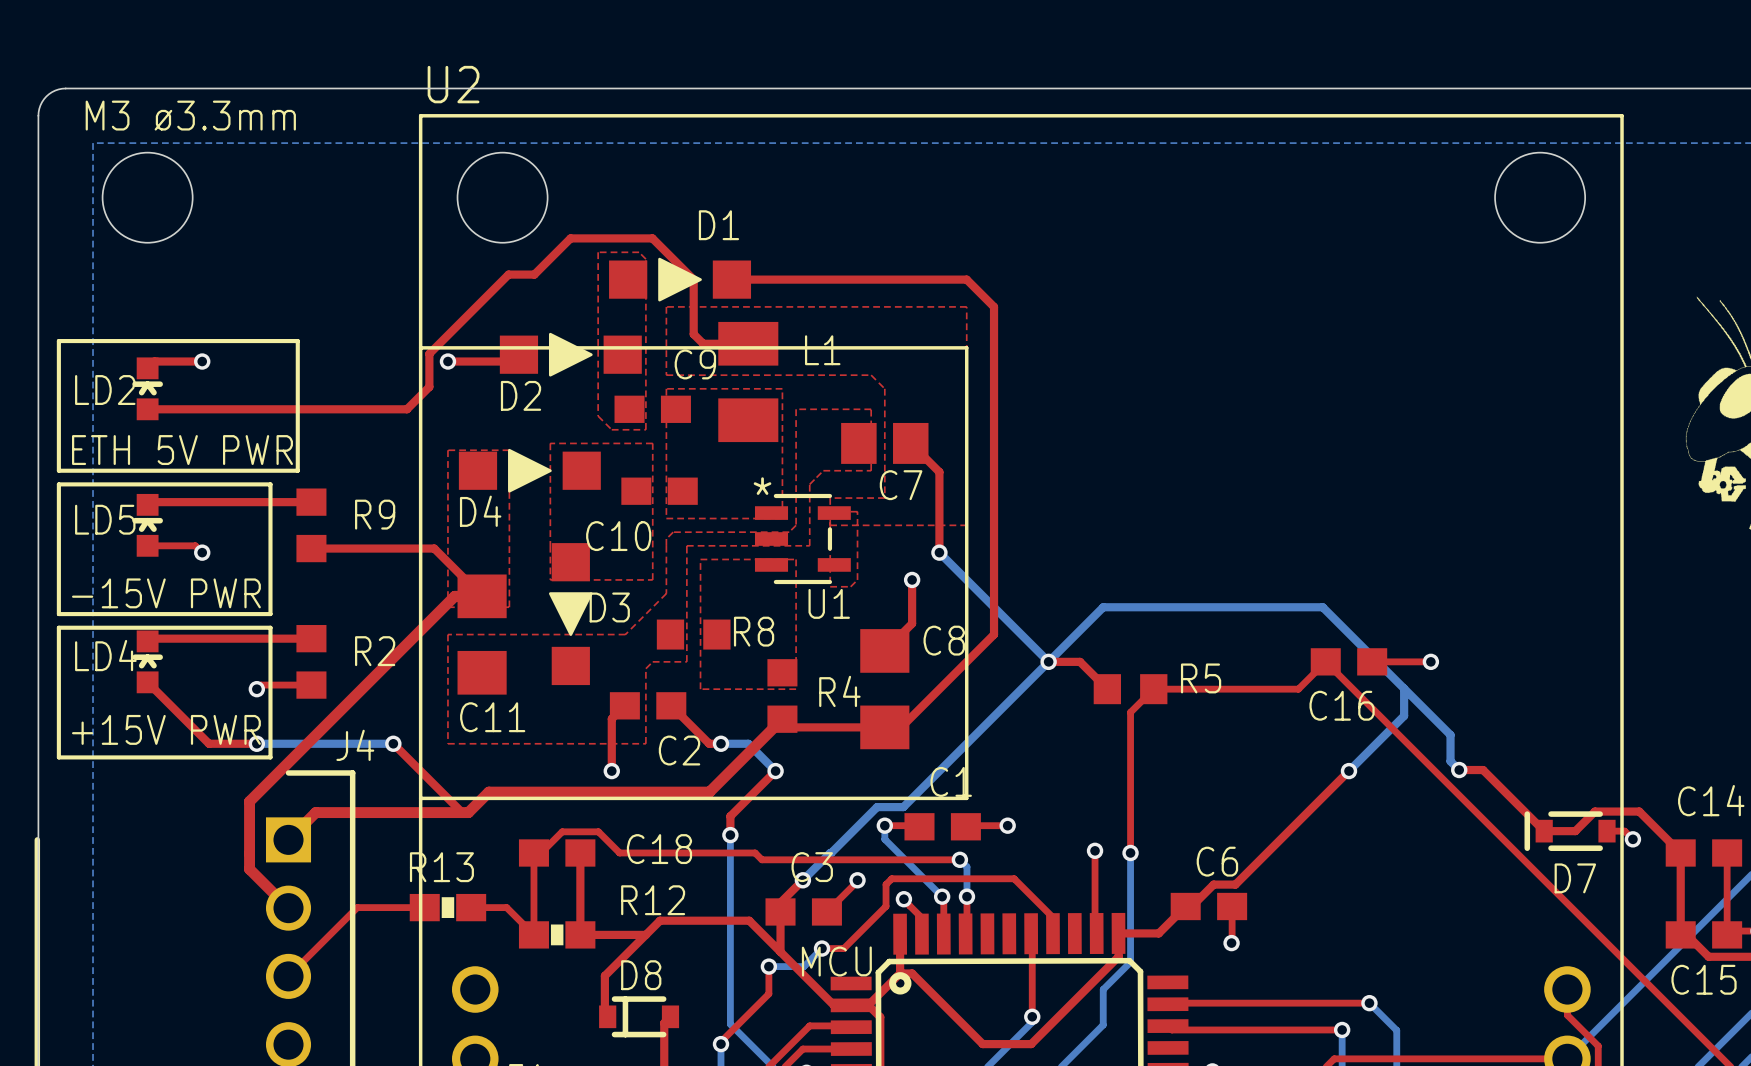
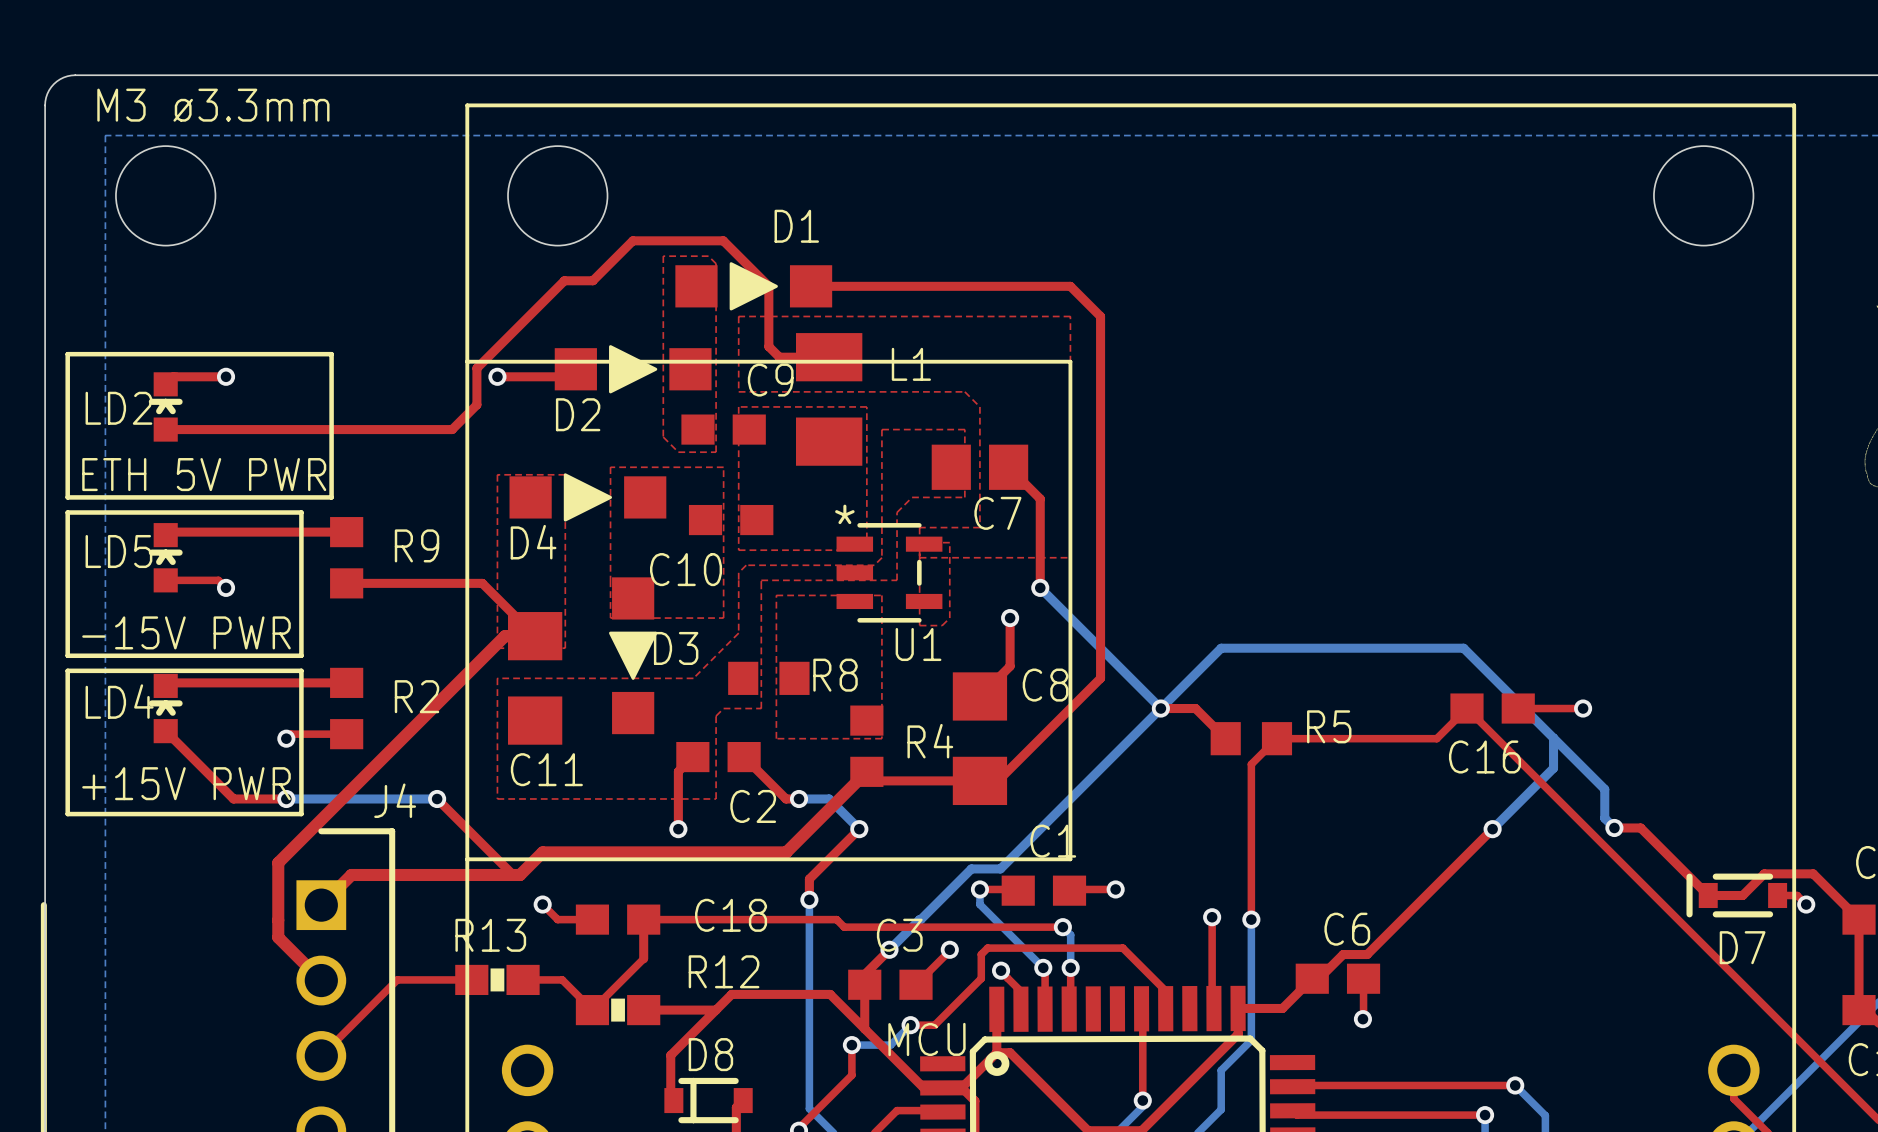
U2 name: U2 (453, 84) -> none
top track: none -> (542, 904) (557, 919) (592, 919)
via: none -> (542, 904)
top track: (619, 852) (598, 831) (562, 831) (541, 852) (533, 852) (533, 934) -> (687, 919) (643, 919)
top track: (580, 888) (580, 934) -> (643, 958) (592, 1010)

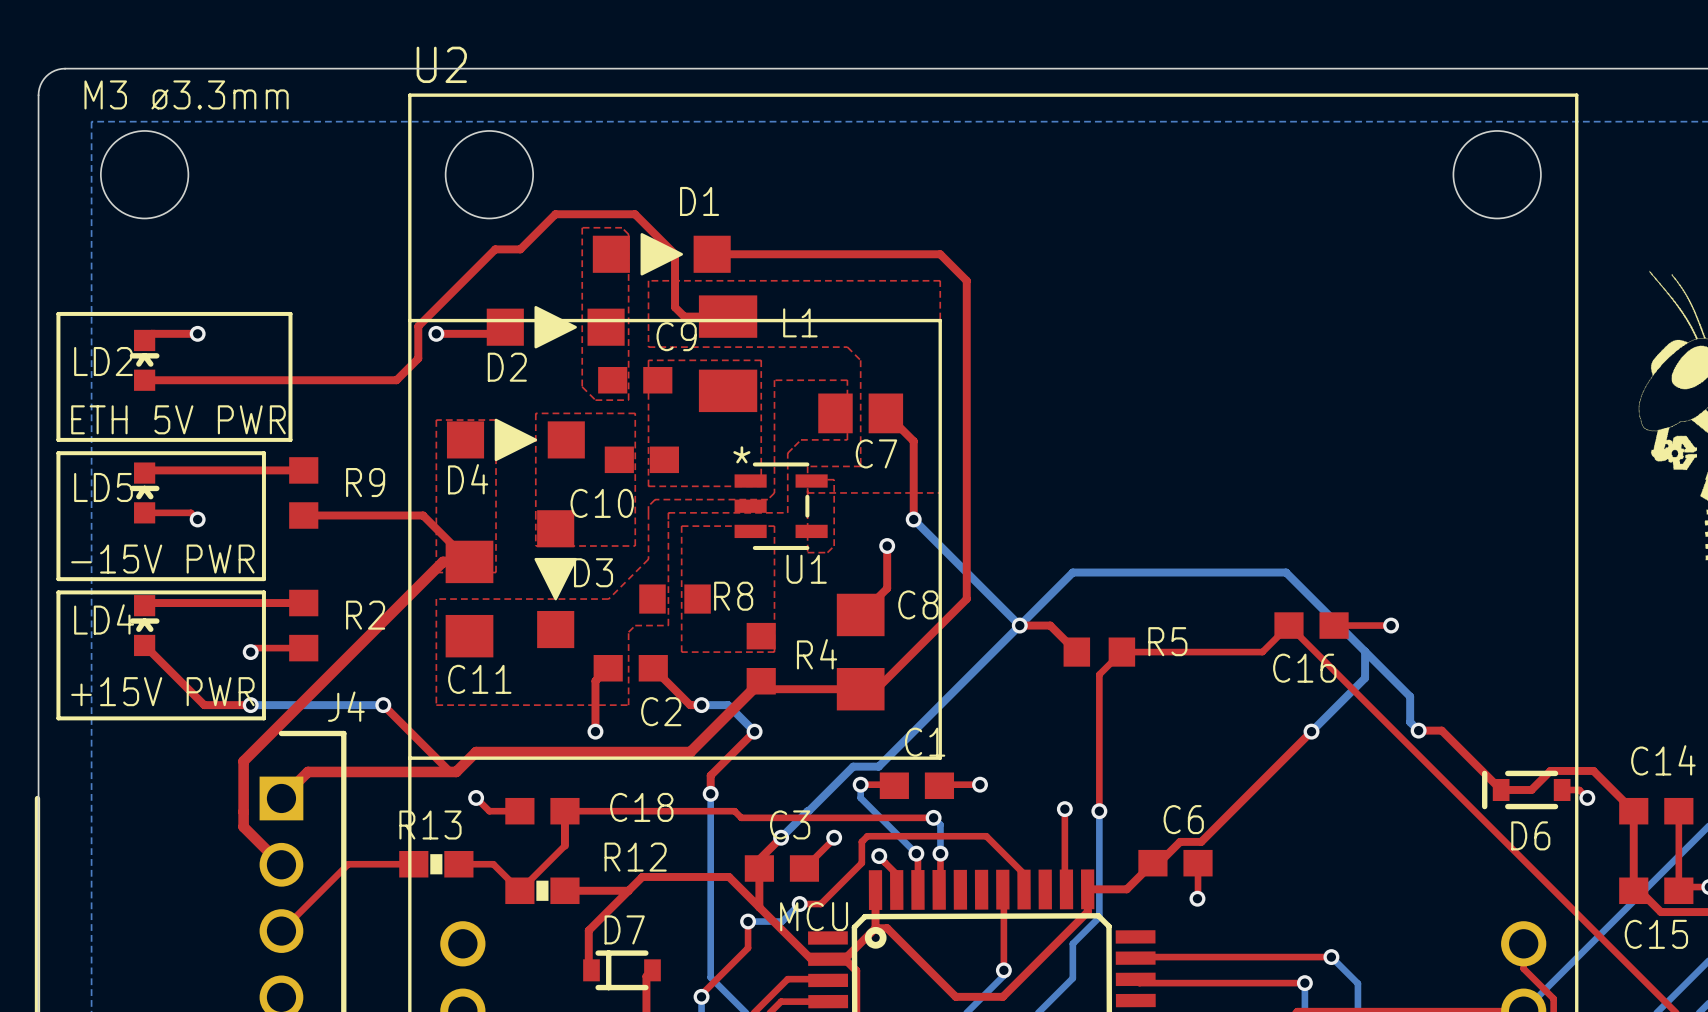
U2 name: none -> U2 (441, 64)
D7 name: D7 (1742, 947) -> D6 (1530, 835)
D8 name: D8 (710, 1054) -> D7 (624, 929)

